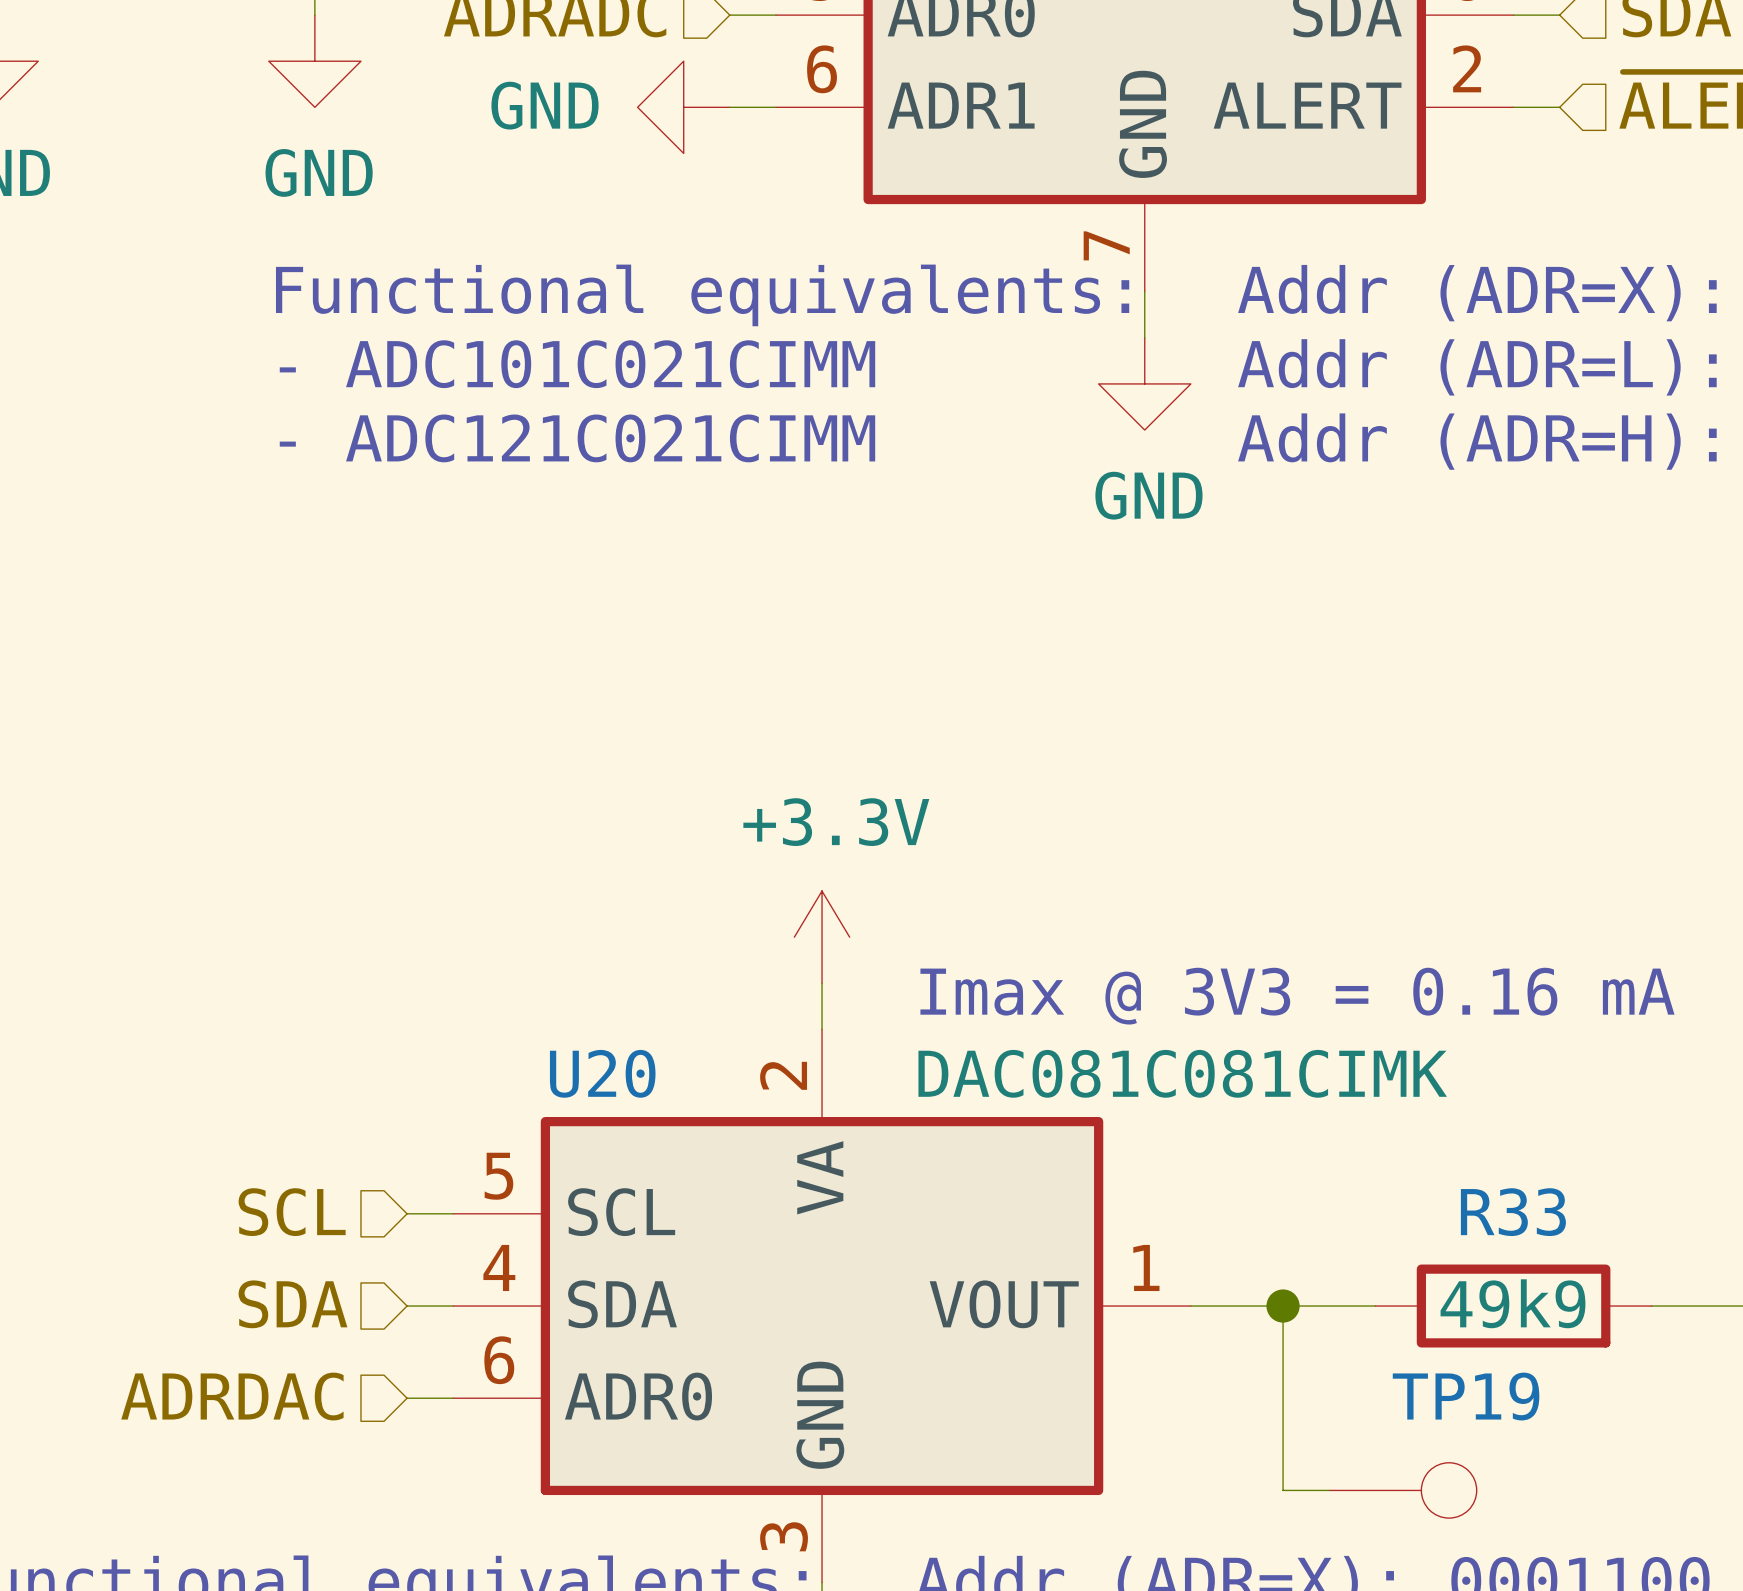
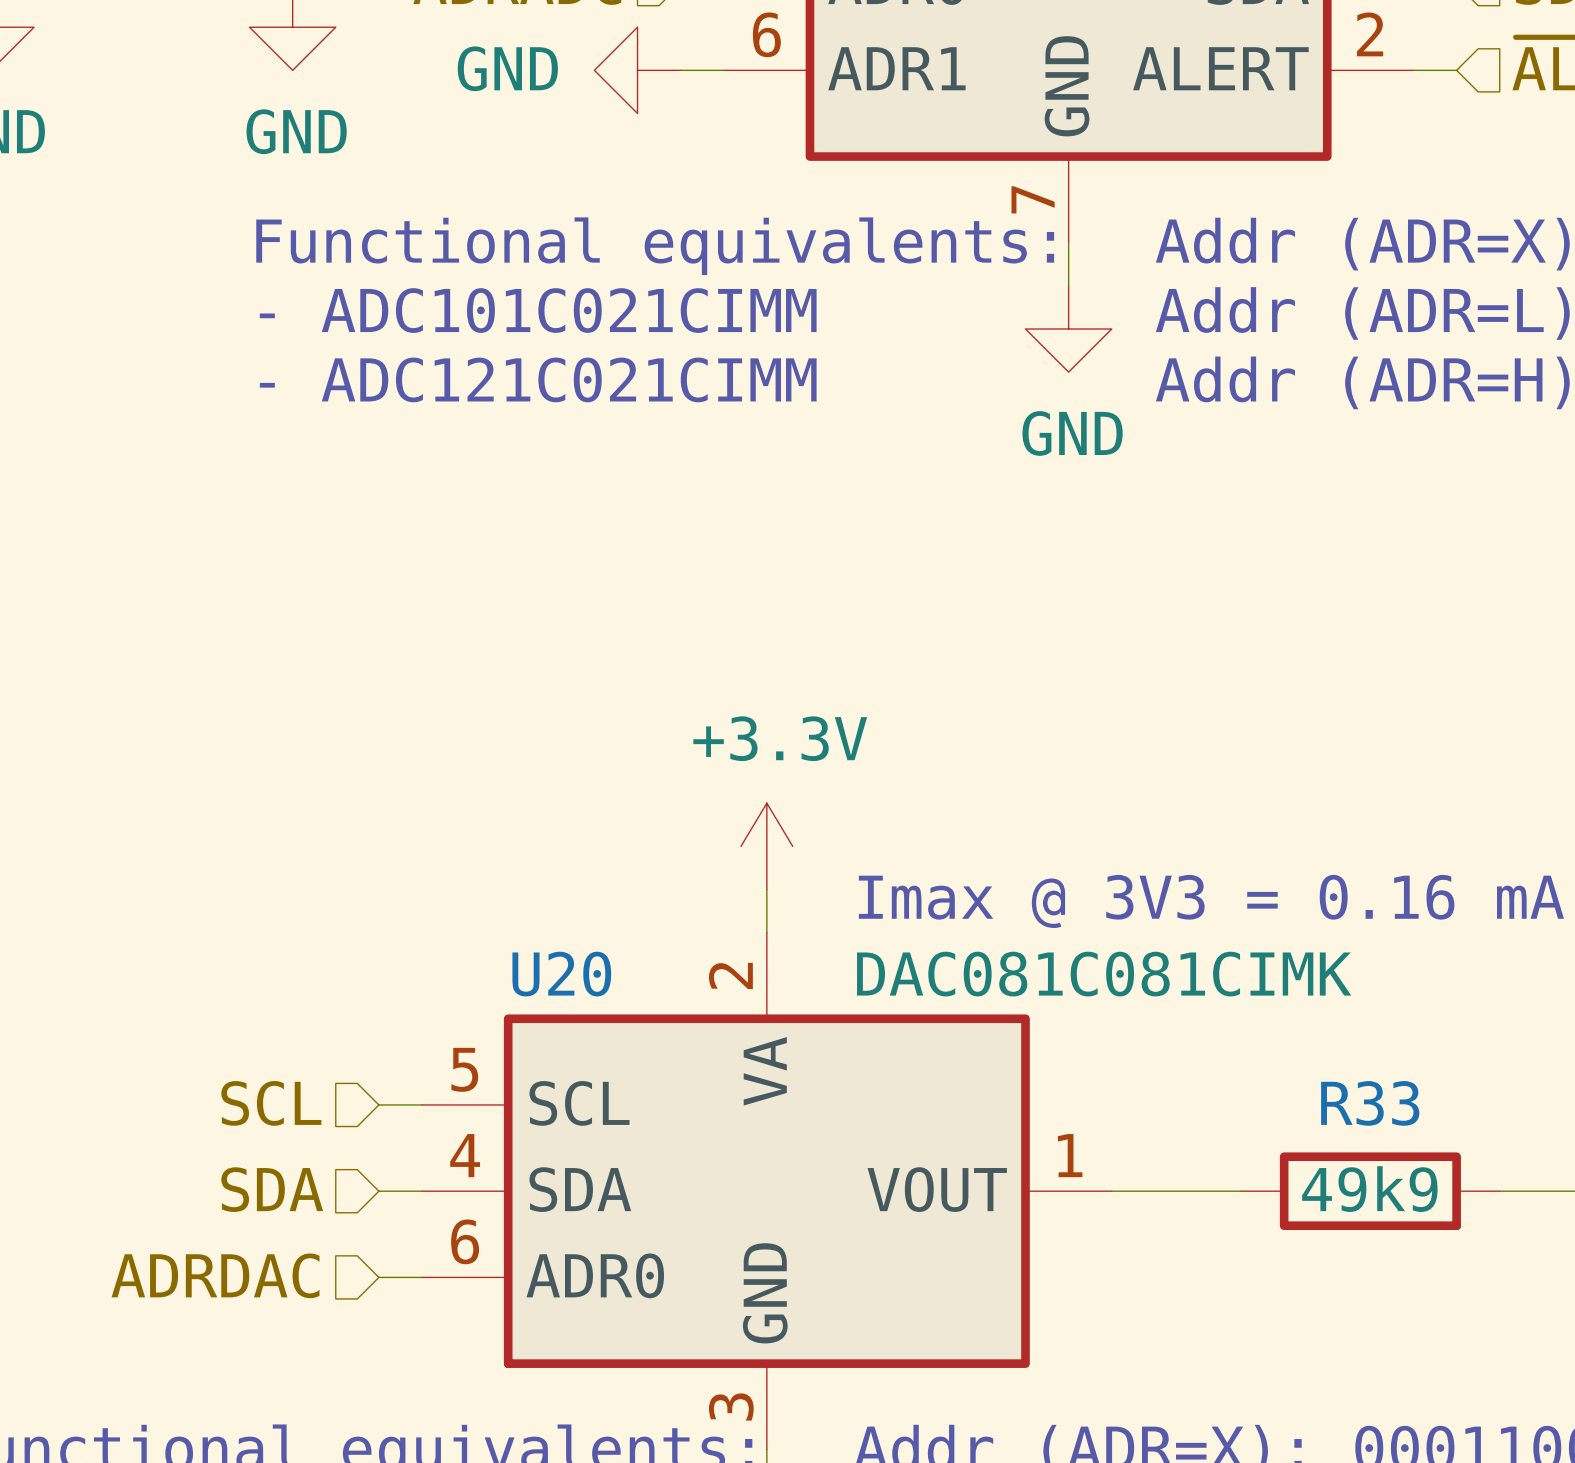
wire: (1283, 1306) (1283, 1490) (1329, 1490) -> none
junction: (1283, 1306) -> none
R33 position: (1513, 1306) -> (1370, 1191)
TP19: (1402, 1490) -> none

